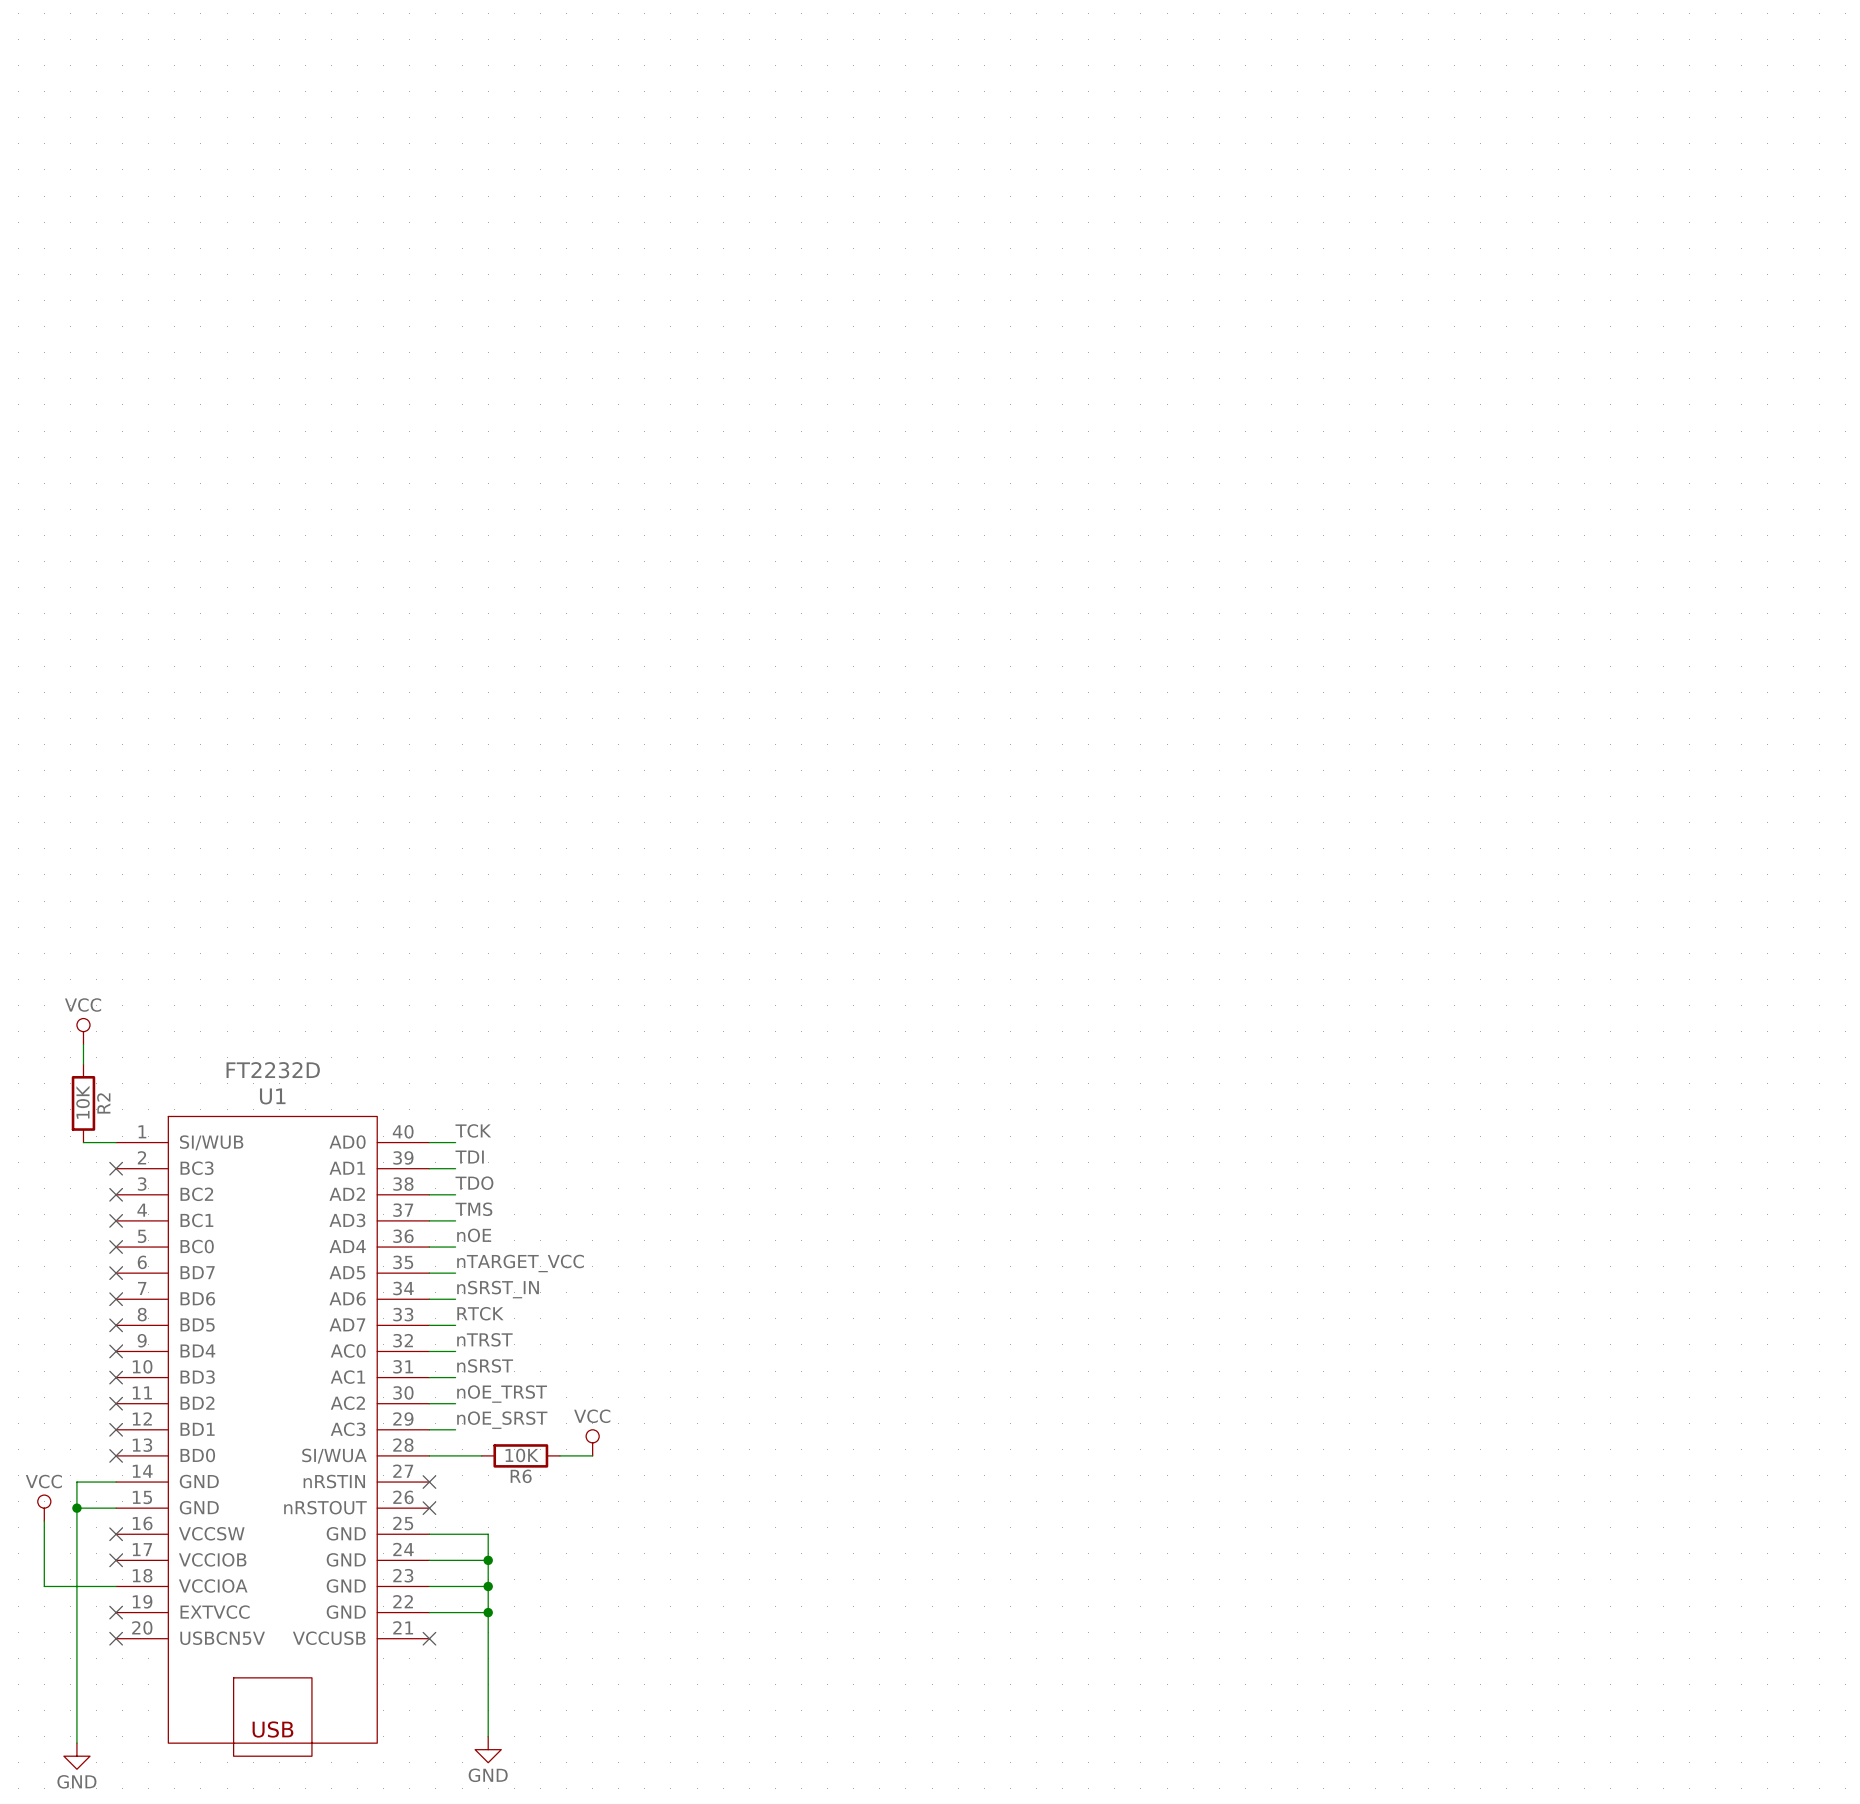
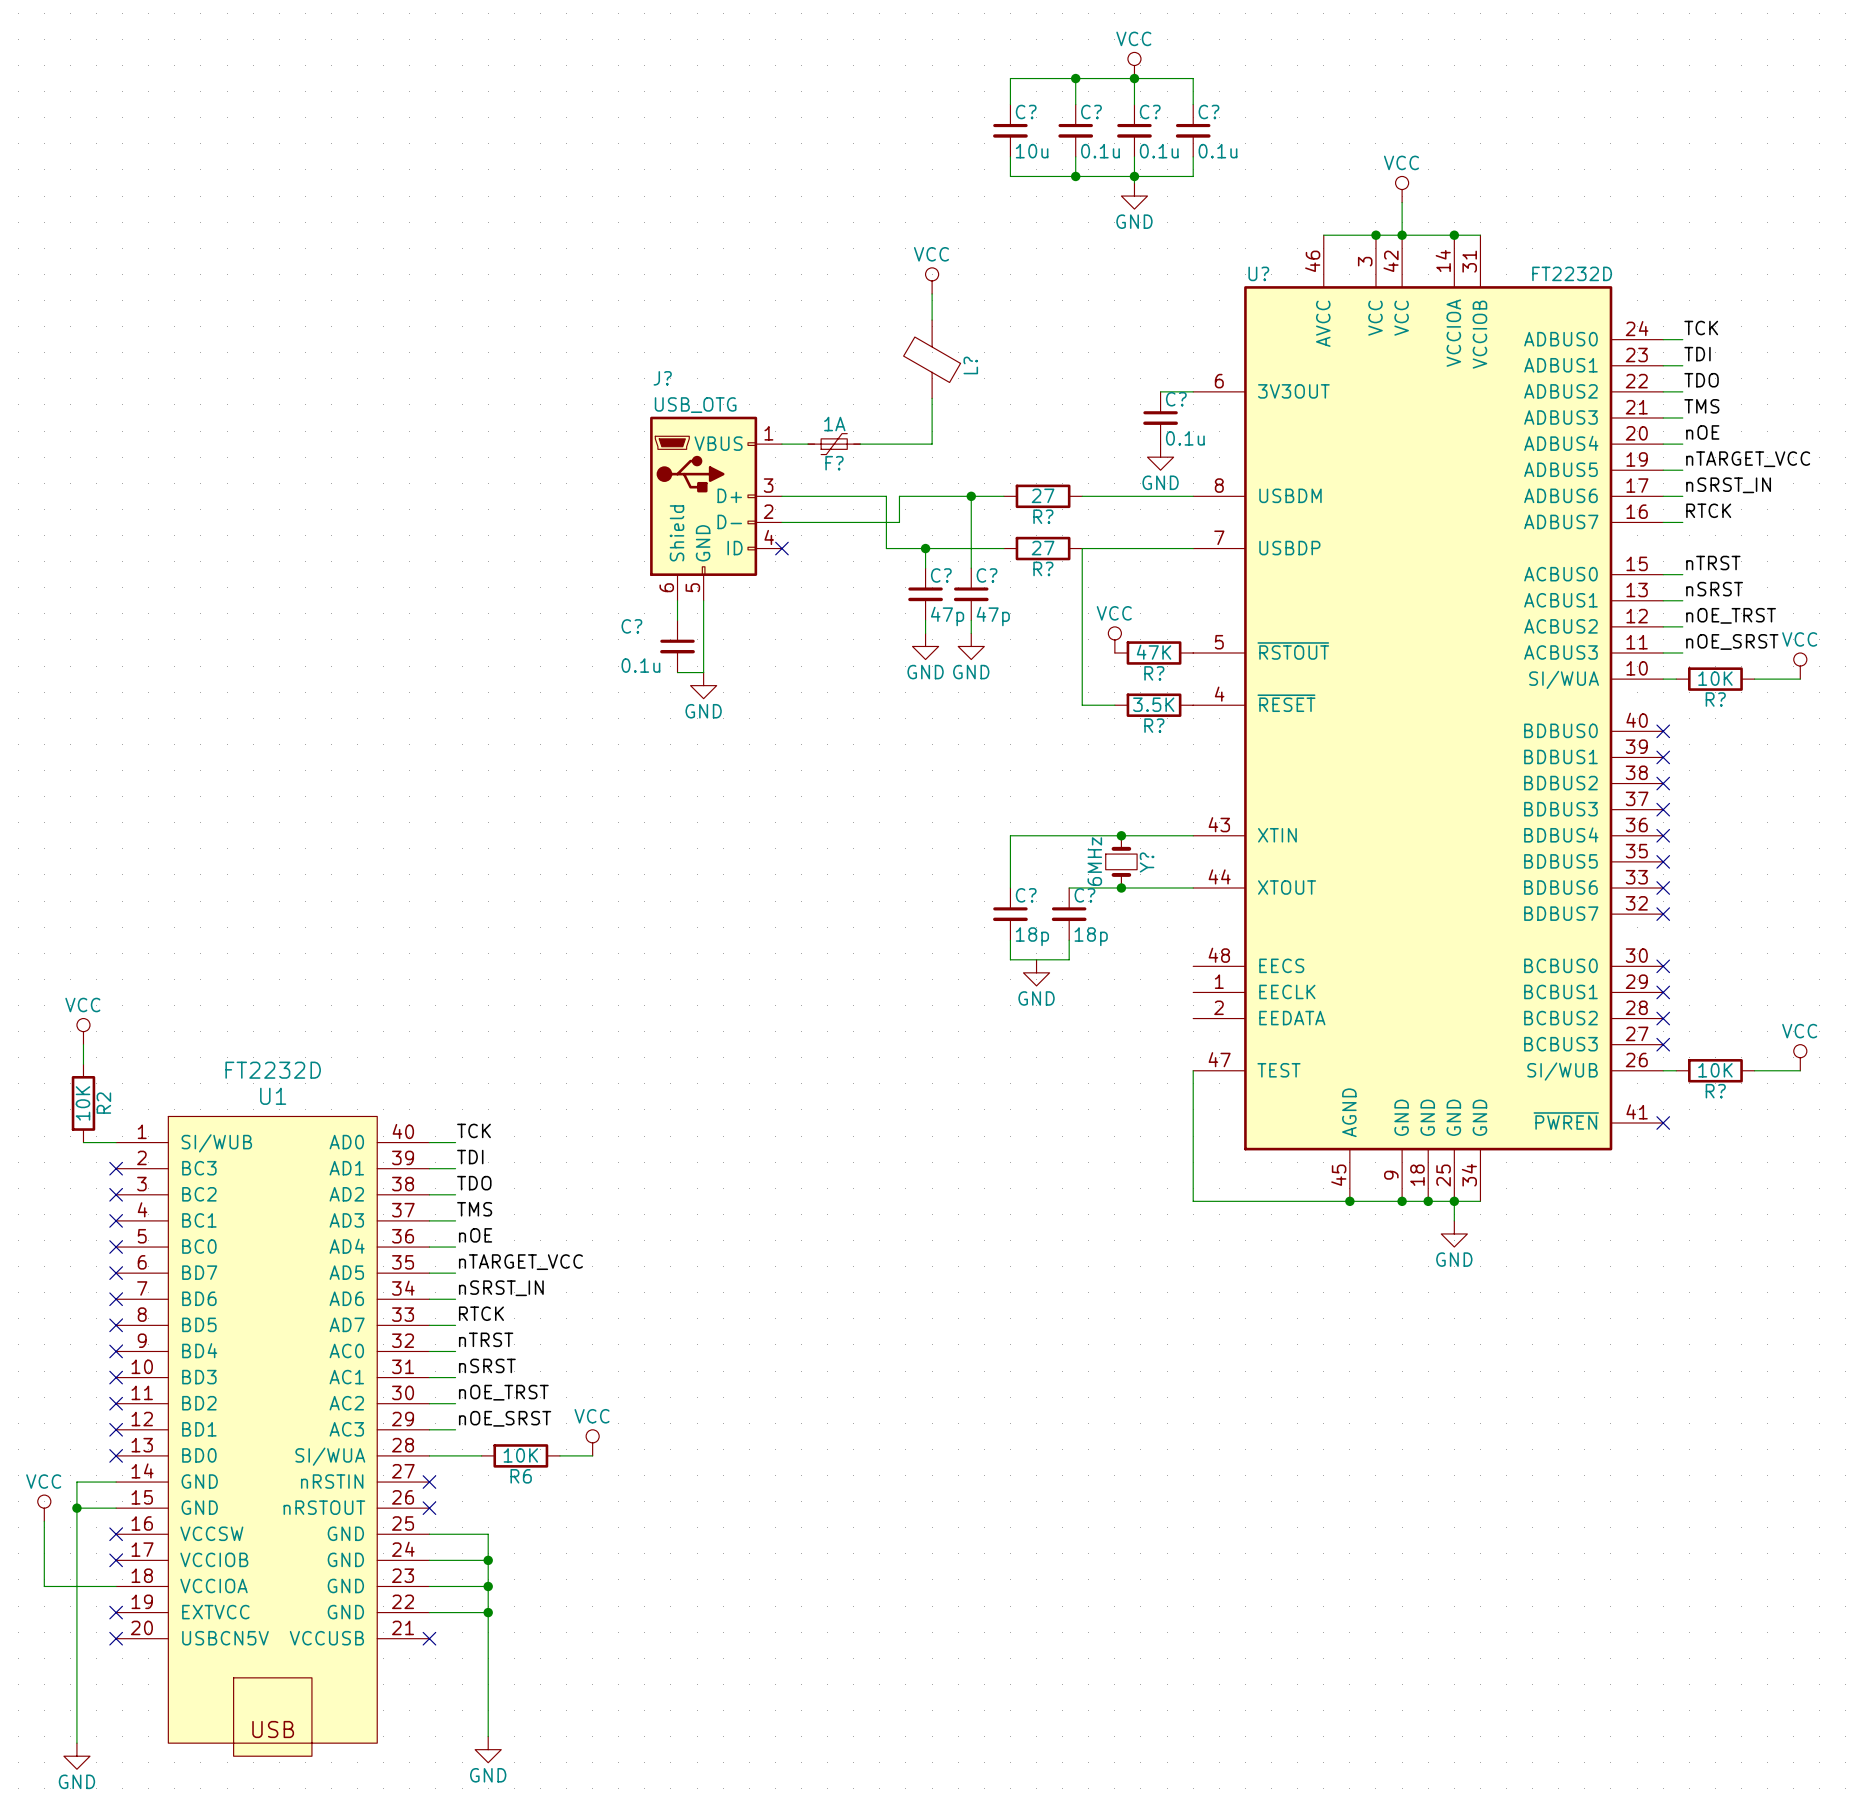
power symbol: none -> VCC (1134, 65)
wire: none -> (1075, 78) (1075, 104)
junction: none -> (1075, 78)
wire: none -> (1134, 78) (1134, 104)
junction: none -> (1134, 78)
wire: none -> (1010, 104) (1010, 78) (1193, 78) (1193, 104)
C?: none -> 10u (1010, 130)
C?: none -> 0.1u (1075, 130)
C?: none -> 0.1u (1134, 130)
C?: none -> 0.1u (1193, 130)
wire: none -> (1010, 156) (1010, 176) (1193, 176) (1193, 156)
wire: none -> (1075, 156) (1075, 176)
wire: none -> (1134, 156) (1134, 182)
junction: none -> (1075, 176)
junction: none -> (1134, 176)
power symbol: none -> VCC (1402, 189)
power symbol: none -> GND (1134, 196)
wire: none -> (1402, 202) (1402, 235)
wire: none -> (1323, 235) (1480, 235)
junction: none -> (1375, 235)
junction: none -> (1402, 235)
junction: none -> (1454, 235)
power symbol: none -> VCC (932, 280)
wire: none -> (932, 293) (932, 320)
label: none -> TCK (1701, 328)
wire: none -> (1663, 339) (1682, 339)
label: none -> TDI (1697, 354)
L?: none -> (932, 359)
wire: none -> (1663, 365) (1682, 365)
label: none -> TDO (1701, 380)
wire: none -> (1160, 391) (1193, 391)
wire: none -> (1663, 391) (1682, 391)
wire: none -> (932, 398) (932, 444) (860, 444)
label: none -> TMS (1701, 406)
C?: none -> 0.1u (1160, 417)
wire: none -> (1663, 417) (1682, 417)
label: none -> nOE (1702, 432)
wire: none -> (781, 444) (808, 444)
F?: none -> 1A (834, 444)
wire: none -> (1663, 444) (1682, 444)
power symbol: none -> GND (1160, 457)
label: none -> nTARGET_VCC (1748, 459)
wire: none -> (1663, 470) (1682, 470)
label: none -> nSRST_IN (1728, 485)
wire: none -> (781, 496) (886, 496) (886, 548) (1003, 548)
wire: none -> (971, 496) (971, 568)
junction: none -> (971, 496)
wire: none -> (1003, 496) (899, 496) (899, 522) (781, 522)
R?: none -> 27 (1043, 496)
wire: none -> (1082, 496) (1193, 496)
wire: none -> (1663, 496) (1682, 496)
J?: none -> USB_OTG (716, 508)
label: none -> RTCK (1708, 510)
wire: none -> (1663, 522) (1682, 522)
no-connect mark: none -> (781, 548)
wire: none -> (925, 548) (925, 568)
junction: none -> (925, 548)
R?: none -> 27 (1043, 548)
wire: none -> (1193, 548) (1082, 548) (1082, 705) (1114, 705)
label: none -> nTRST (1713, 563)
wire: none -> (1663, 574) (1682, 574)
label: none -> nSRST (1714, 589)
C?: none -> 47p (925, 594)
C?: none -> 47p (971, 594)
wire: none -> (677, 600) (677, 620)
wire: none -> (703, 600) (703, 672) (677, 672)
wire: none -> (1663, 600) (1682, 600)
label: none -> nOE_TRST (1731, 615)
wire: none -> (925, 620) (925, 633)
wire: none -> (971, 620) (971, 633)
wire: none -> (1663, 626) (1682, 626)
power symbol: none -> VCC (1114, 639)
label: none -> nOE_SRST (1732, 641)
C?: none -> 0.1u (677, 646)
power symbol: none -> GND (925, 646)
power symbol: none -> GND (971, 646)
R?: none -> 47K (1154, 652)
wire: none -> (1663, 652) (1682, 652)
power symbol: none -> VCC (1800, 666)
wire: none -> (1663, 679) (1676, 679)
R?: none -> 10K (1715, 679)
wire: none -> (1754, 679) (1800, 679)
power symbol: none -> GND (703, 685)
R?: none -> 3.5K (1154, 705)
U?: none -> FT2232D (1428, 718)
no-connect mark: none -> (1663, 731)
no-connect mark: none -> (1663, 757)
no-connect mark: none -> (1663, 783)
no-connect mark: none -> (1663, 809)
junction: none -> (1121, 835)
wire: none -> (1193, 835) (1010, 835) (1010, 888)
no-connect mark: none -> (1663, 835)
Y?: none -> 6MHz (1121, 861)
no-connect mark: none -> (1663, 861)
wire: none -> (1069, 888) (1193, 888)
junction: none -> (1121, 888)
no-connect mark: none -> (1663, 888)
C?: none -> 18p (1010, 914)
C?: none -> 18p (1069, 914)
no-connect mark: none -> (1663, 914)
wire: none -> (1010, 940) (1010, 959) (1069, 959) (1069, 940)
no-connect mark: none -> (1663, 966)
power symbol: none -> GND (1036, 972)
no-connect mark: none -> (1663, 992)
no-connect mark: none -> (1663, 1018)
no-connect mark: none -> (1663, 1044)
power symbol: none -> VCC (1800, 1057)
wire: none -> (1193, 1070) (1193, 1201) (1480, 1201)
wire: none -> (1663, 1070) (1676, 1070)
R?: none -> 10K (1715, 1070)
wire: none -> (1754, 1070) (1800, 1070)
no-connect mark: none -> (1663, 1123)
junction: none -> (1349, 1201)
junction: none -> (1402, 1201)
junction: none -> (1428, 1201)
wire: none -> (1454, 1201) (1454, 1220)
junction: none -> (1454, 1201)
power symbol: none -> GND (1454, 1233)

